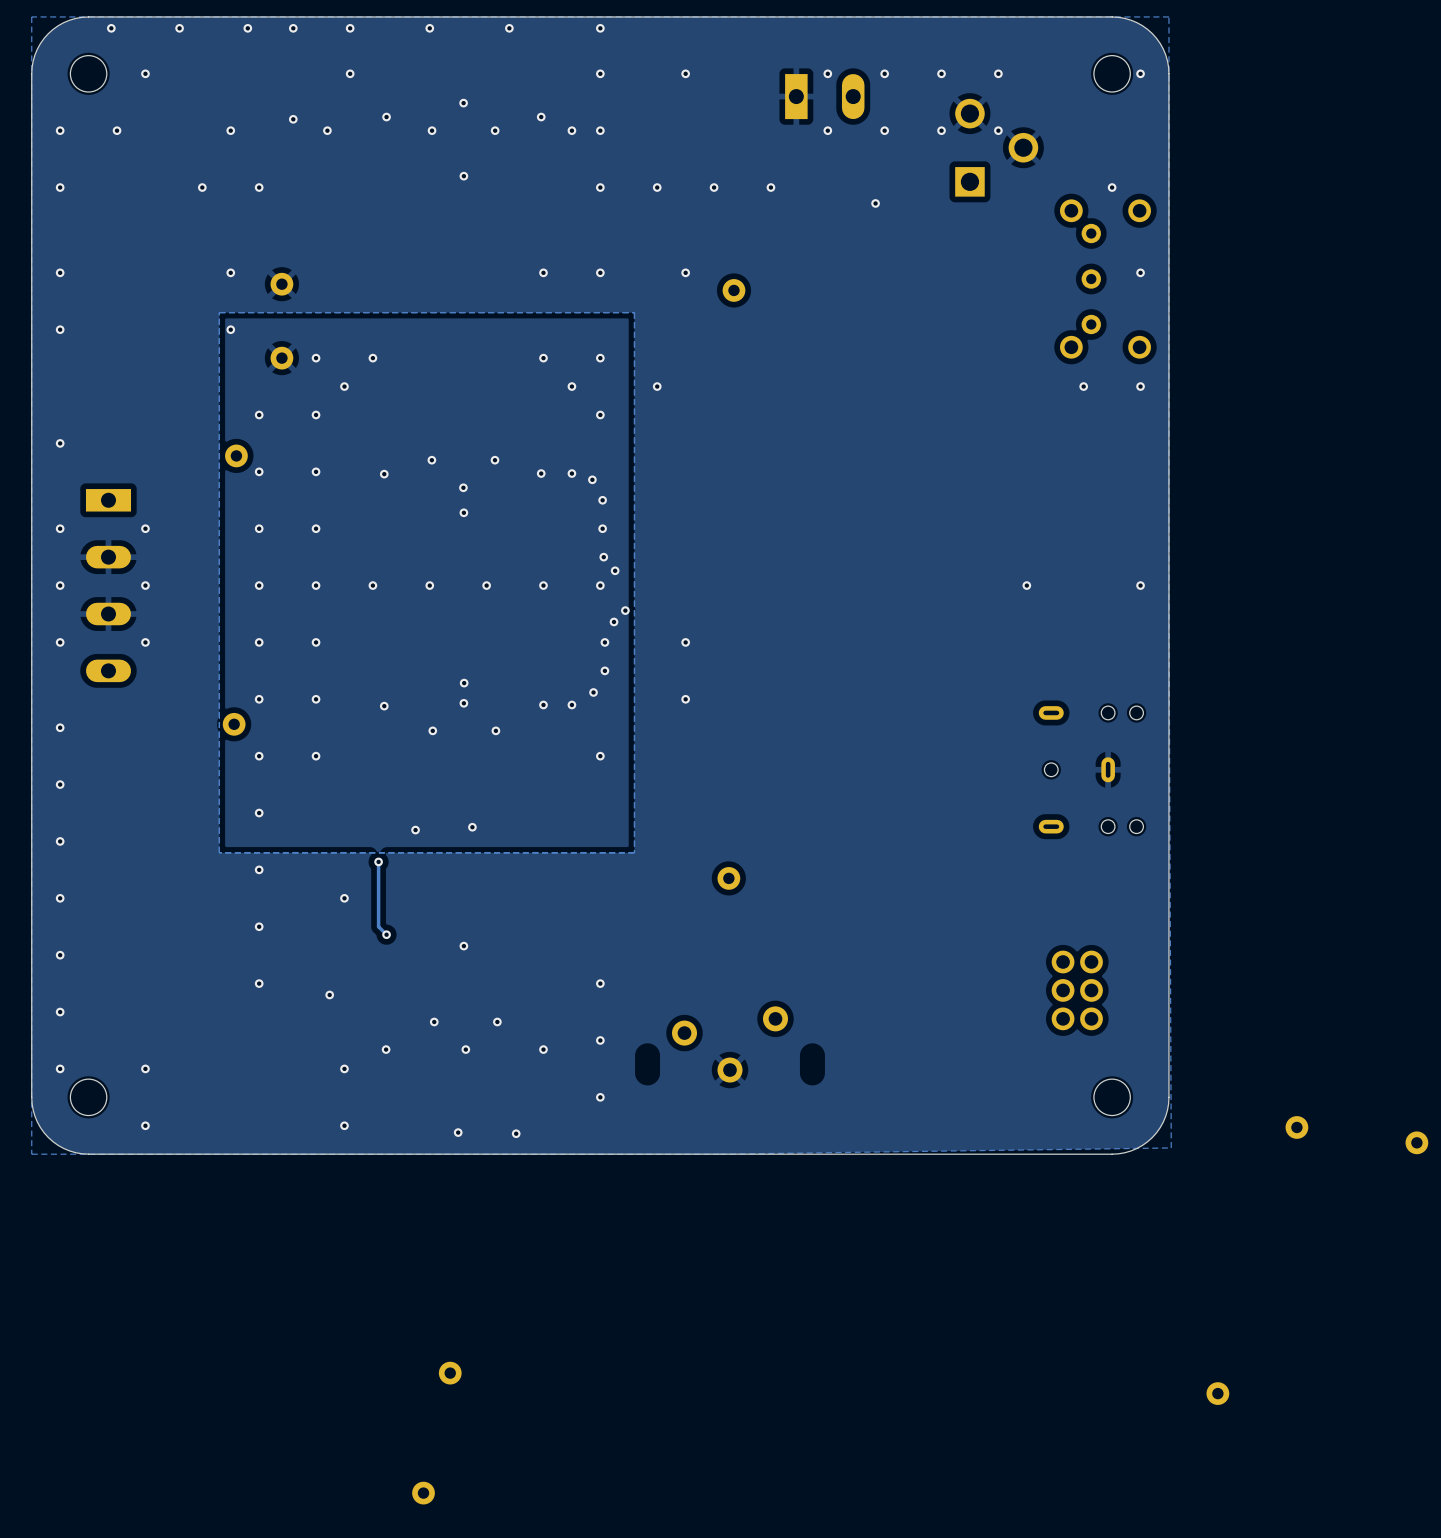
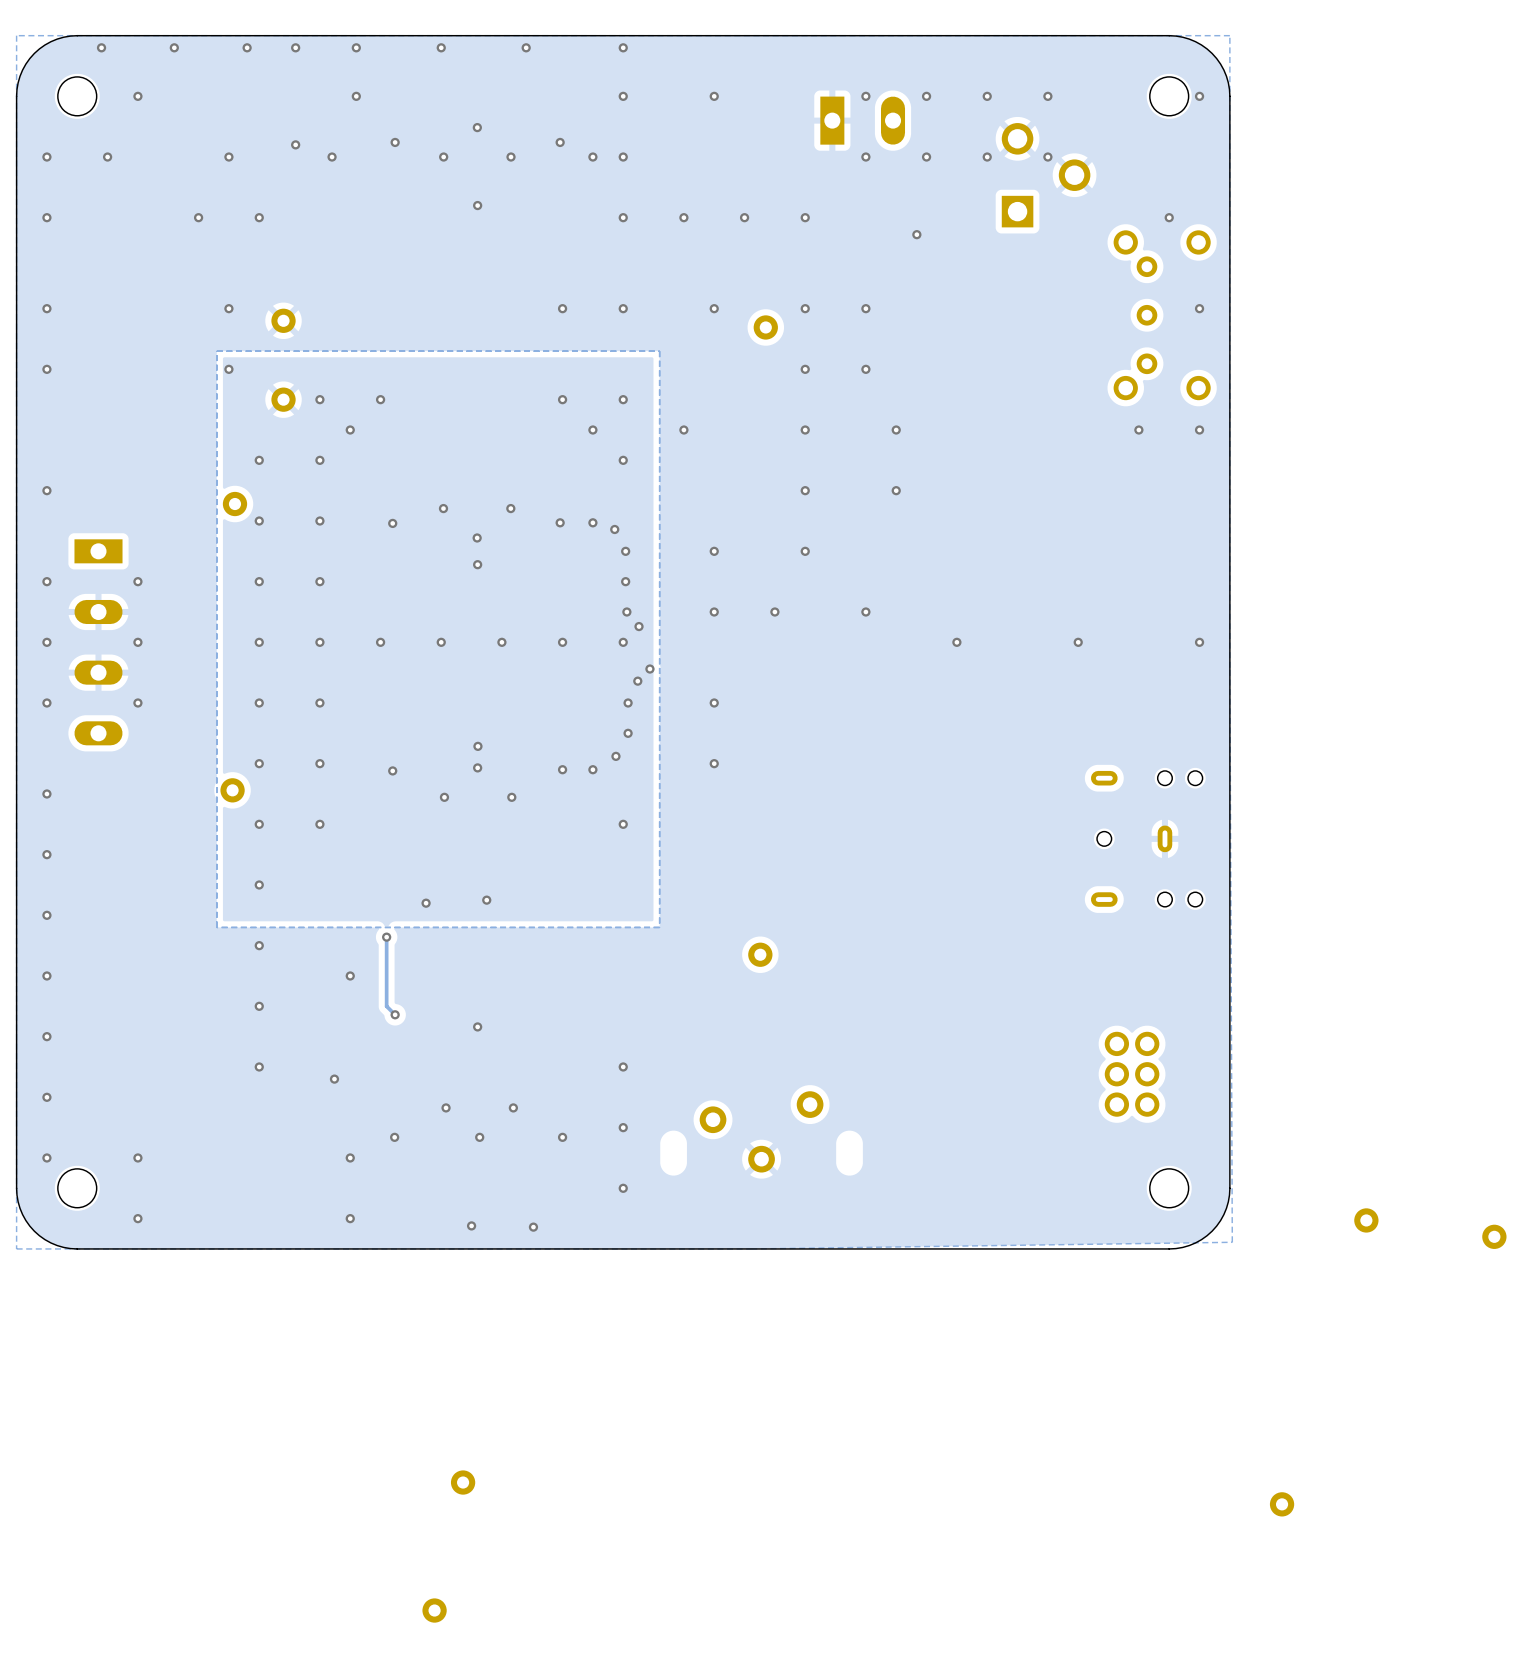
via: none -> (805, 308)
via: none -> (865, 308)
via: none -> (805, 369)
via: none -> (865, 369)
via: none -> (805, 430)
via: none -> (896, 430)
via: none -> (805, 490)
via: none -> (896, 490)
via: none -> (714, 551)
via: none -> (805, 551)
via: none -> (714, 611)
via: none -> (774, 611)
via: none -> (865, 611)
via: none -> (956, 642)

